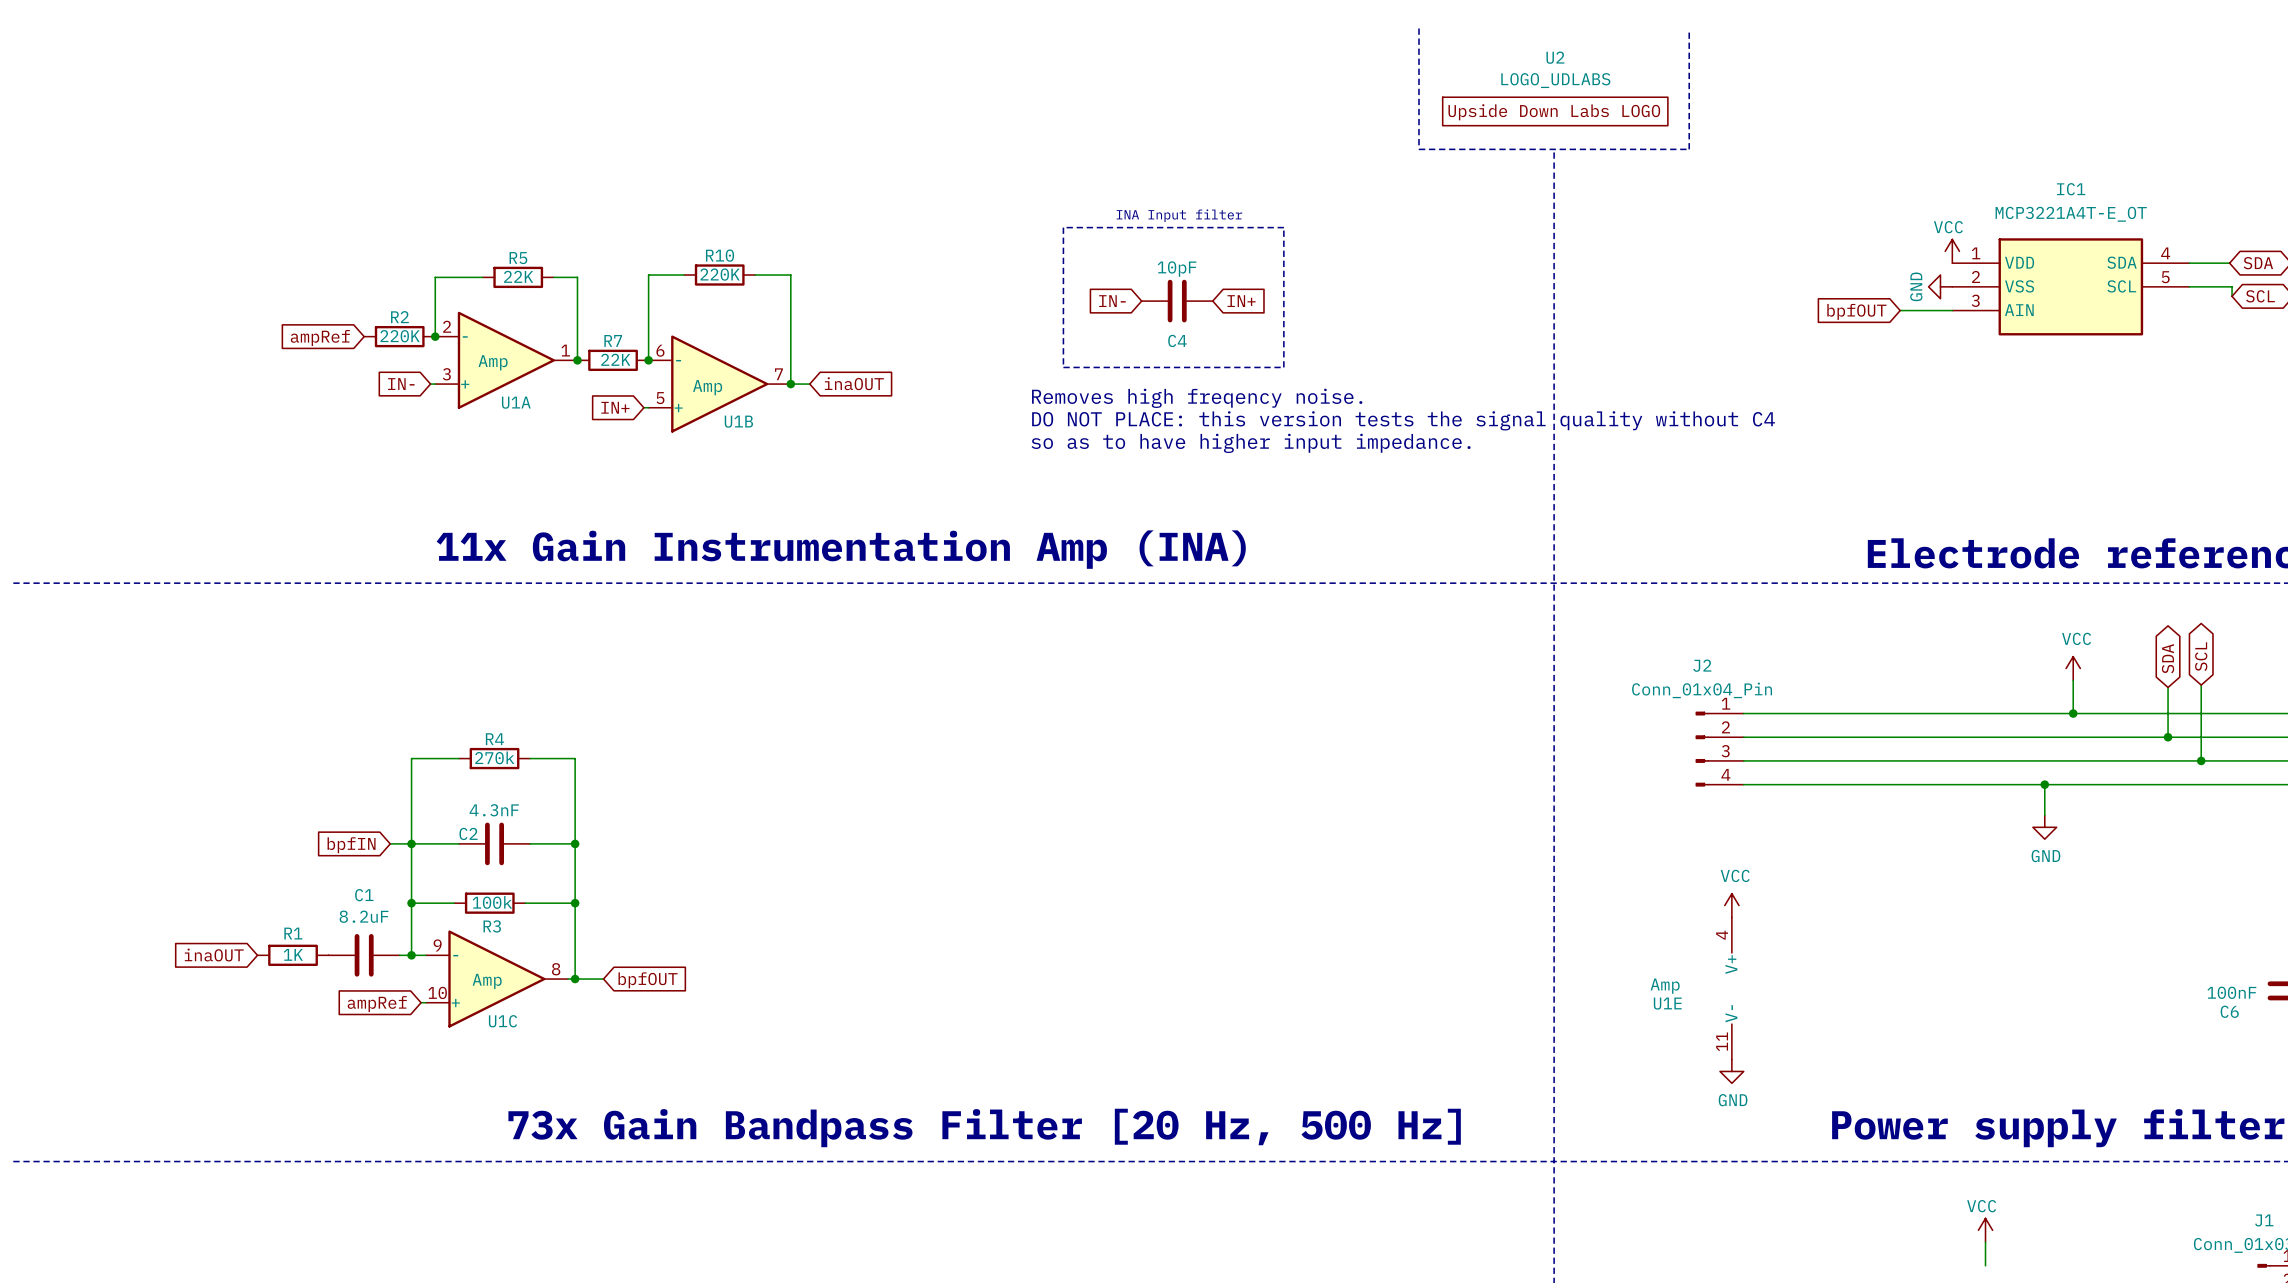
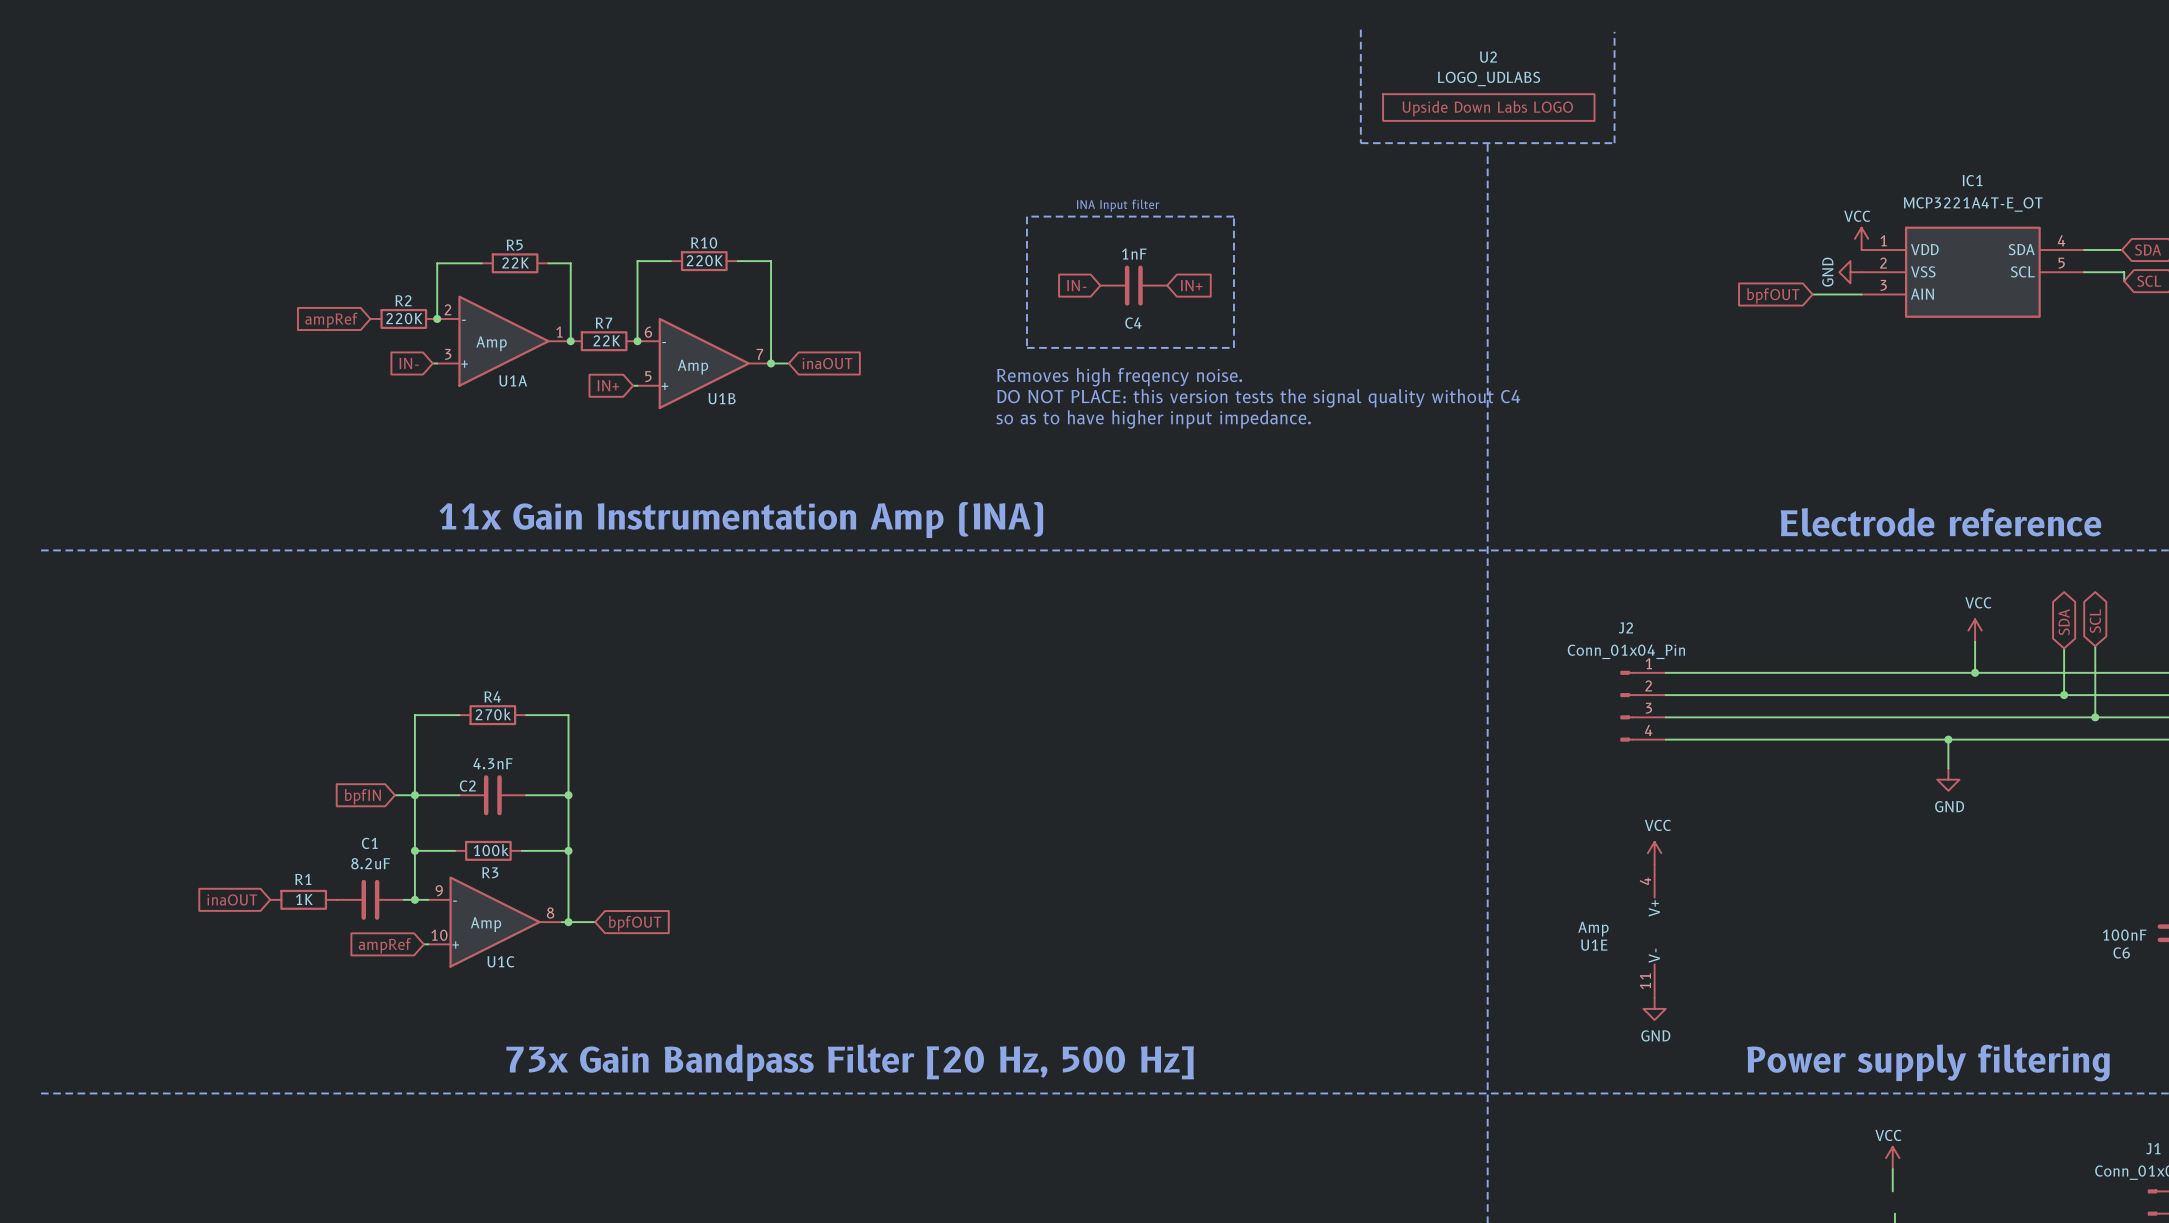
C4 value: 10pF (1177, 269) -> 1nF (1134, 254)

